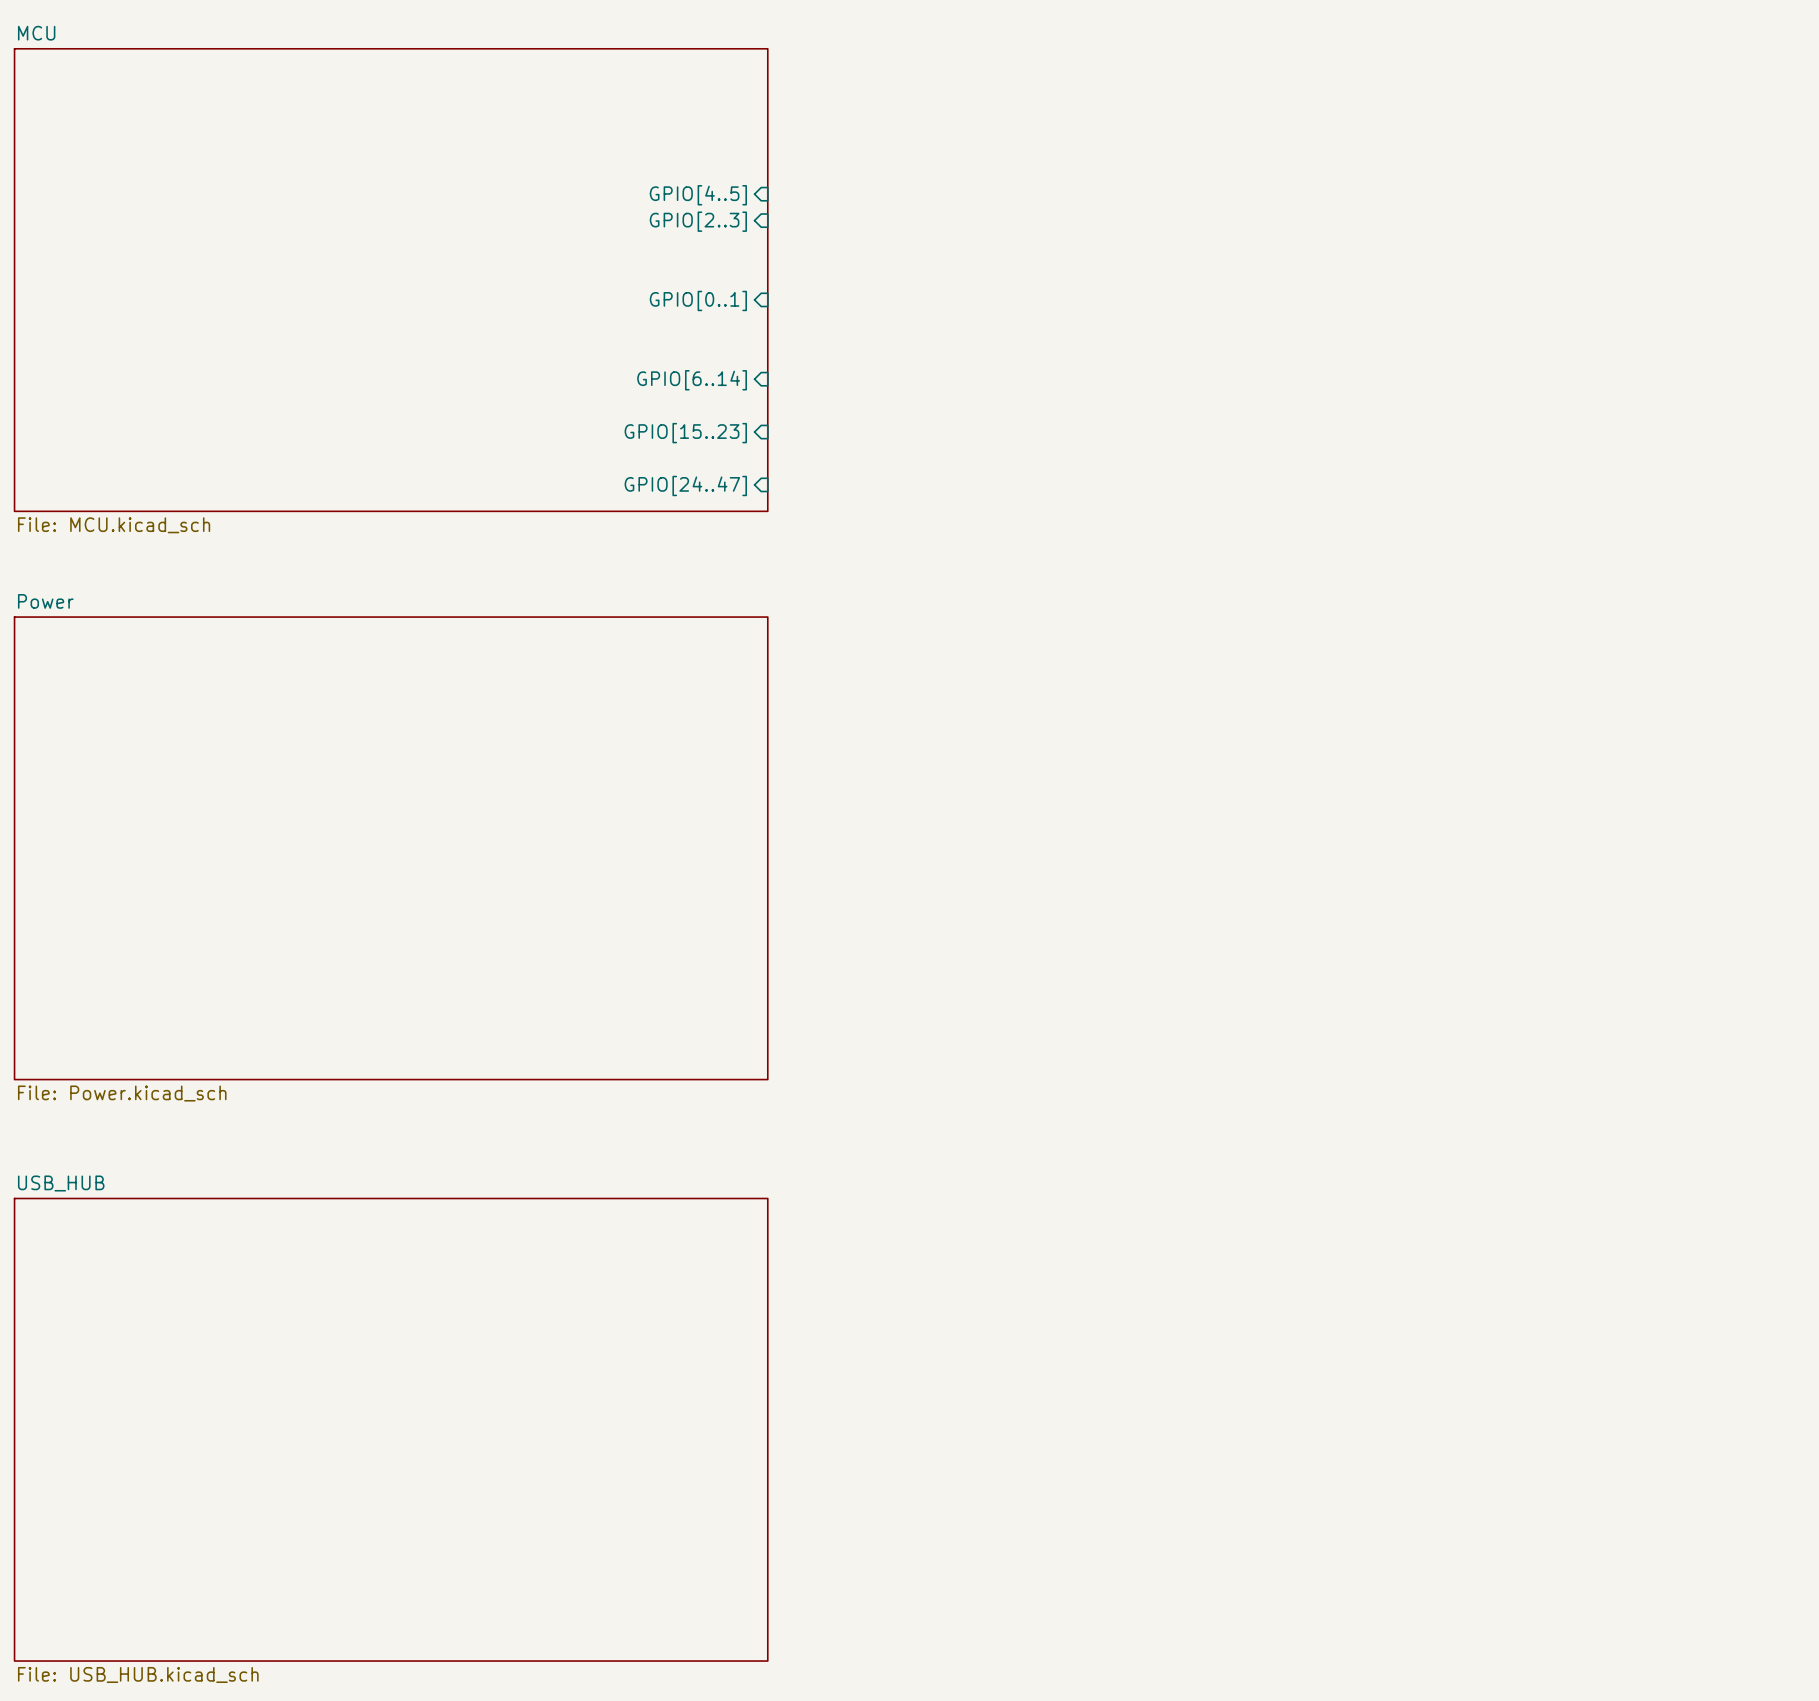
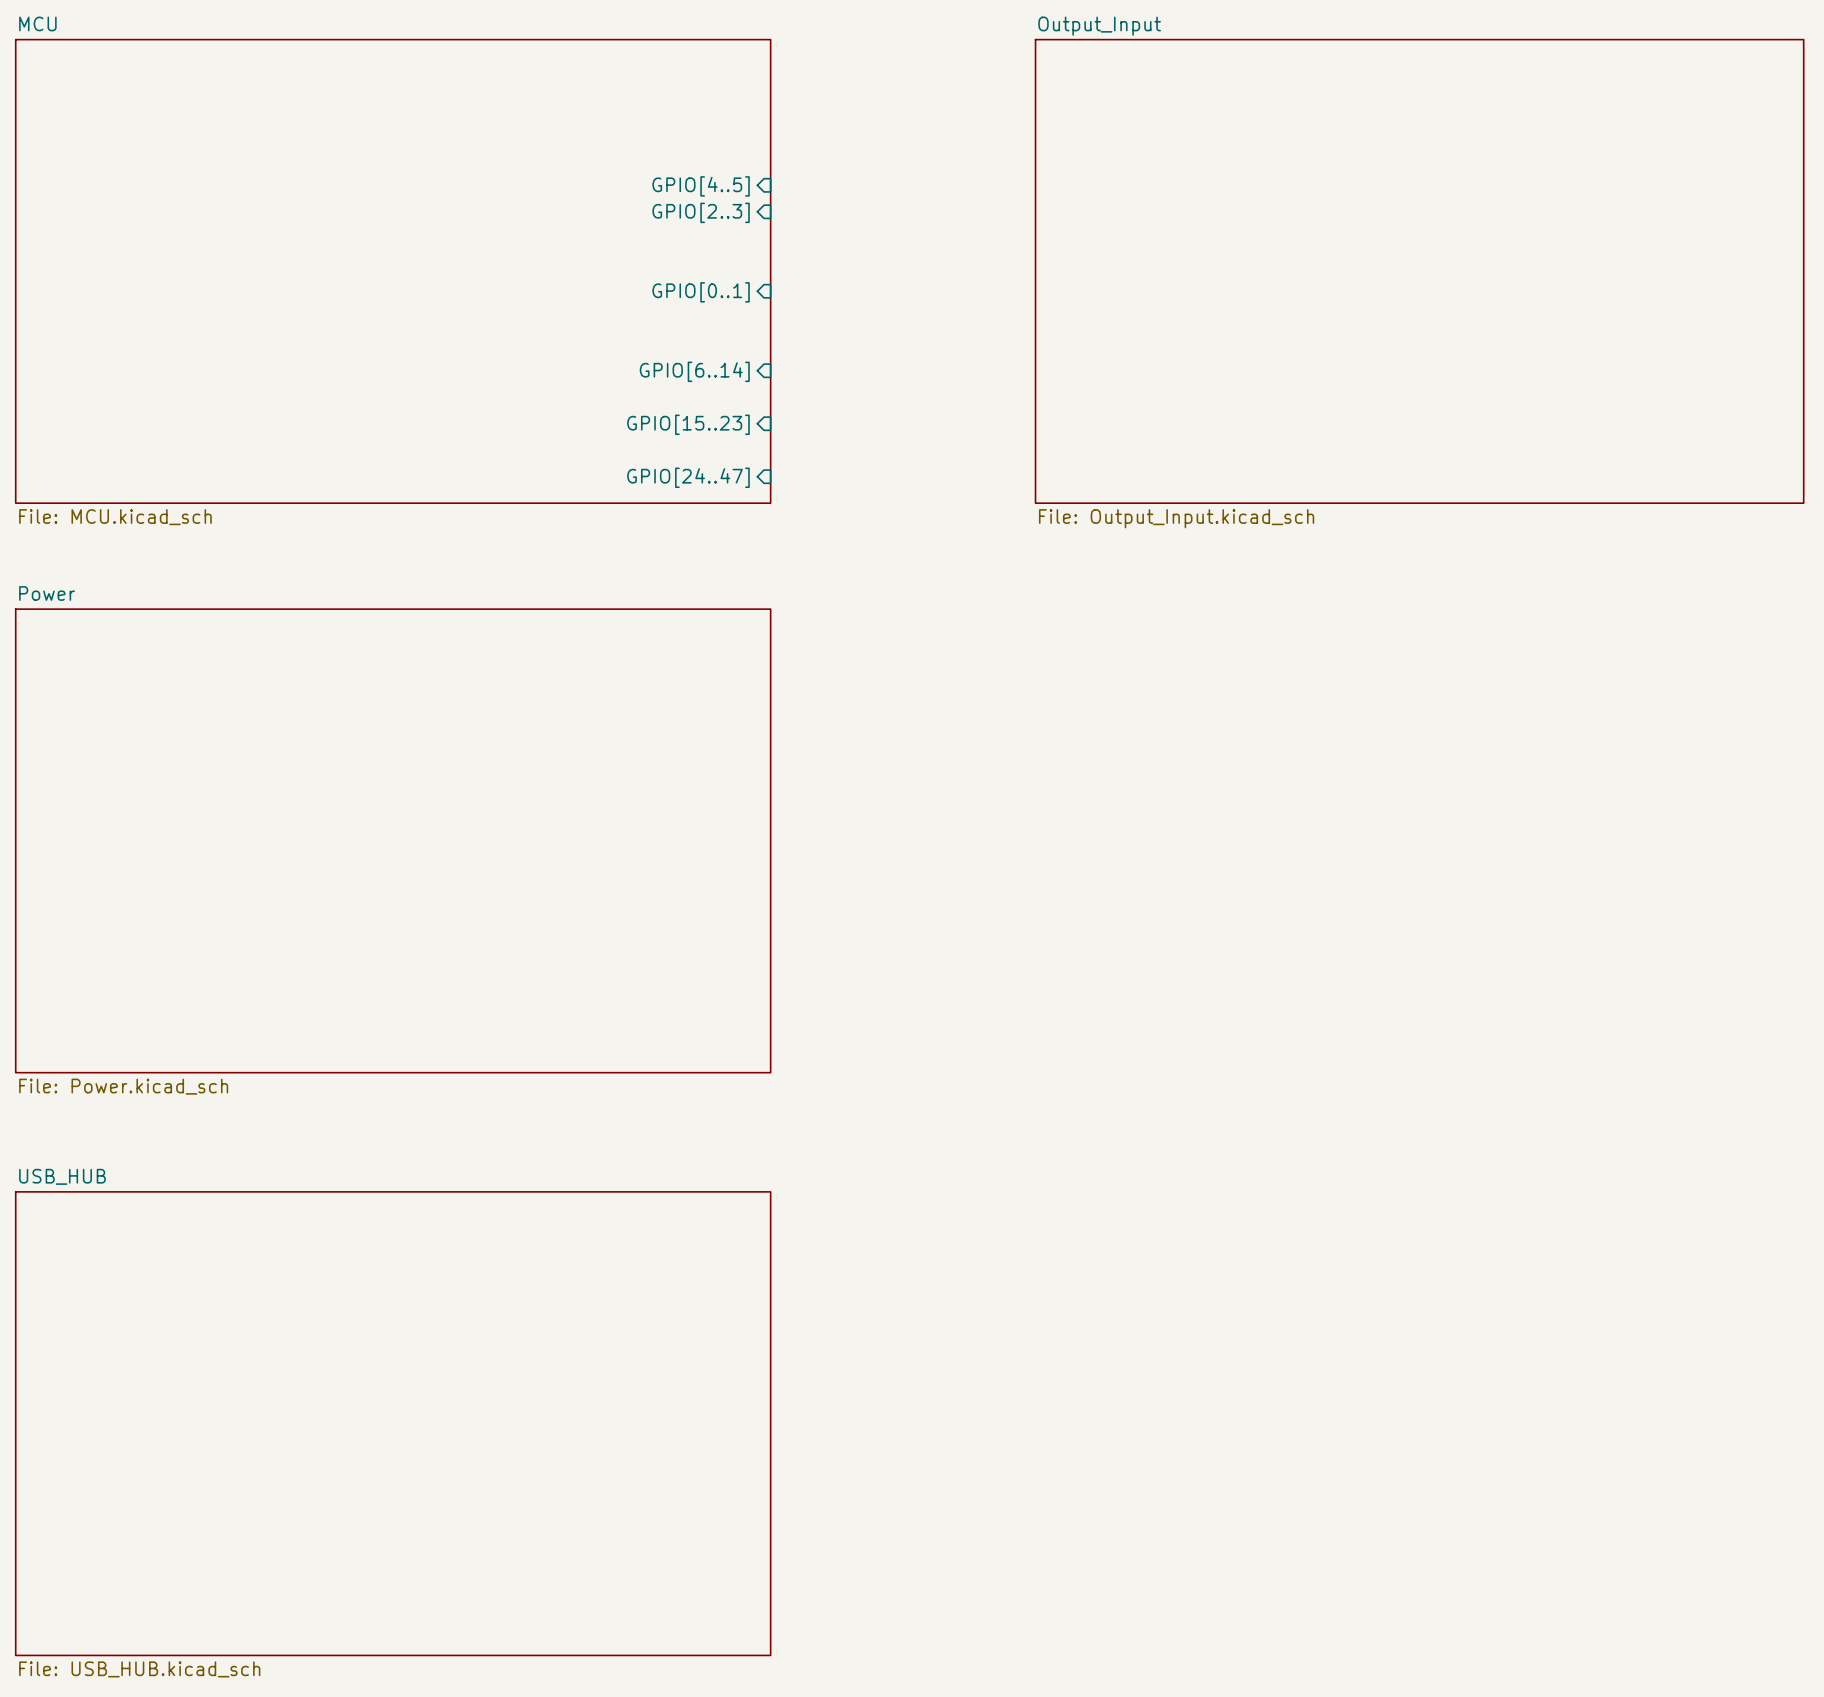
sheet Output_Input: none -> File: Output_Input.kicad_sch (1419, 271)

